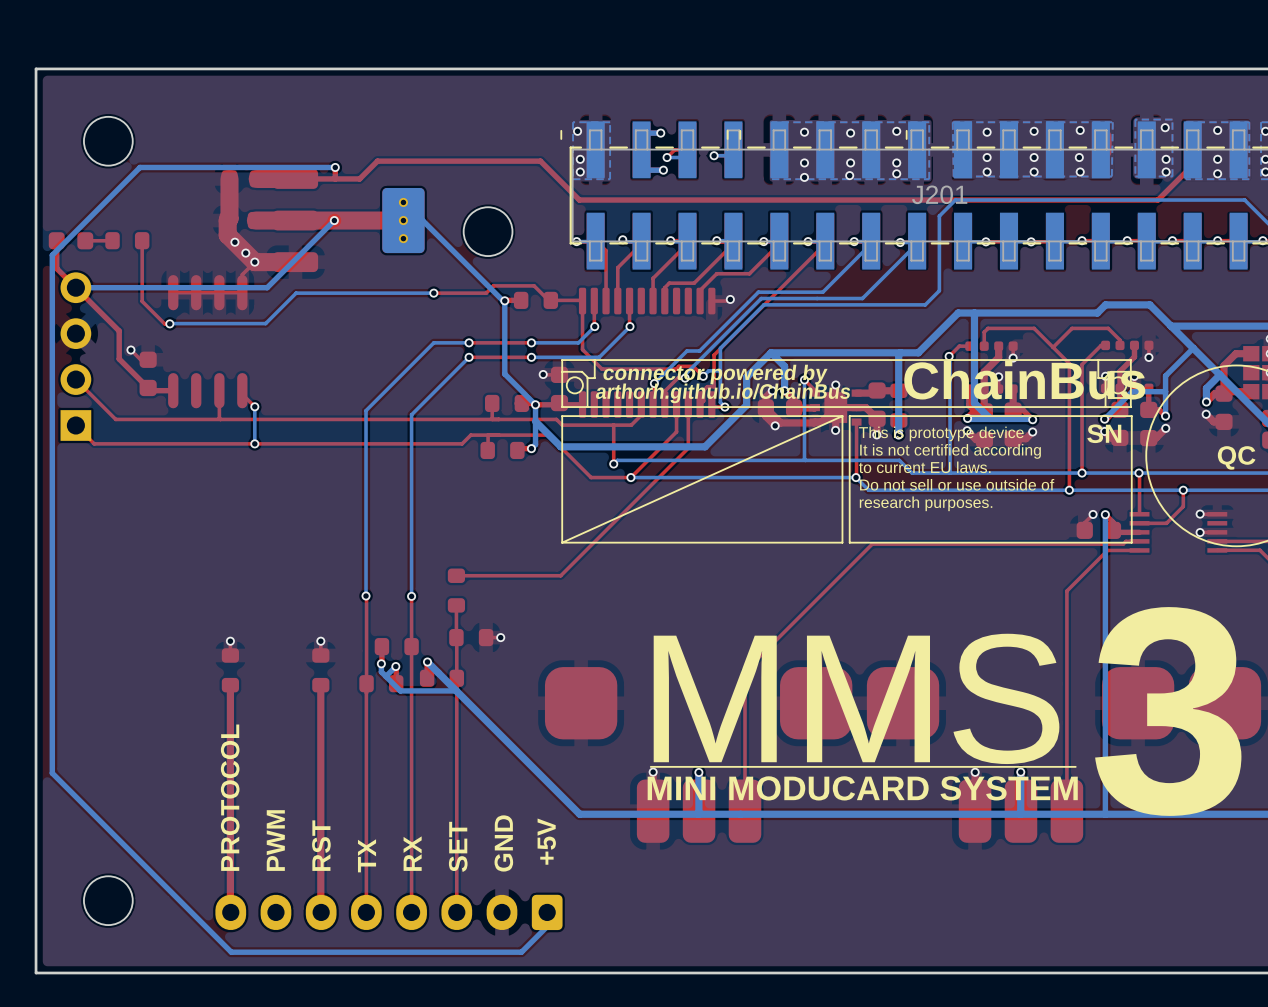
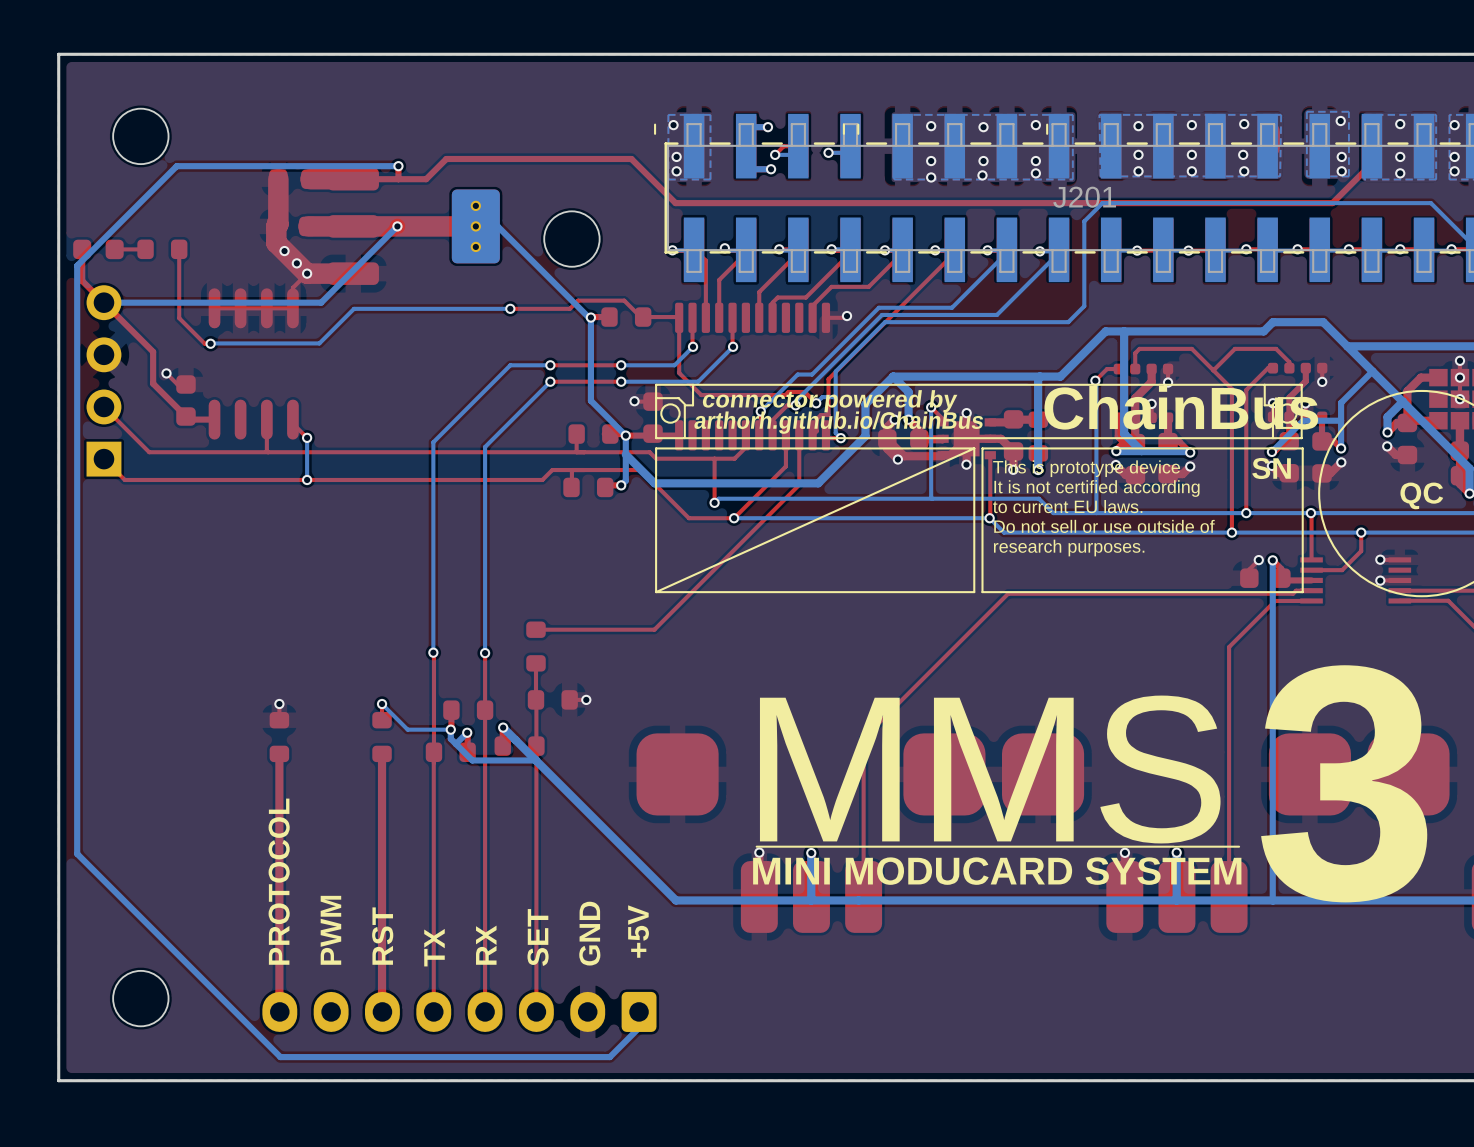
bottom track: none -> (382, 704) (407, 729) (450, 729)

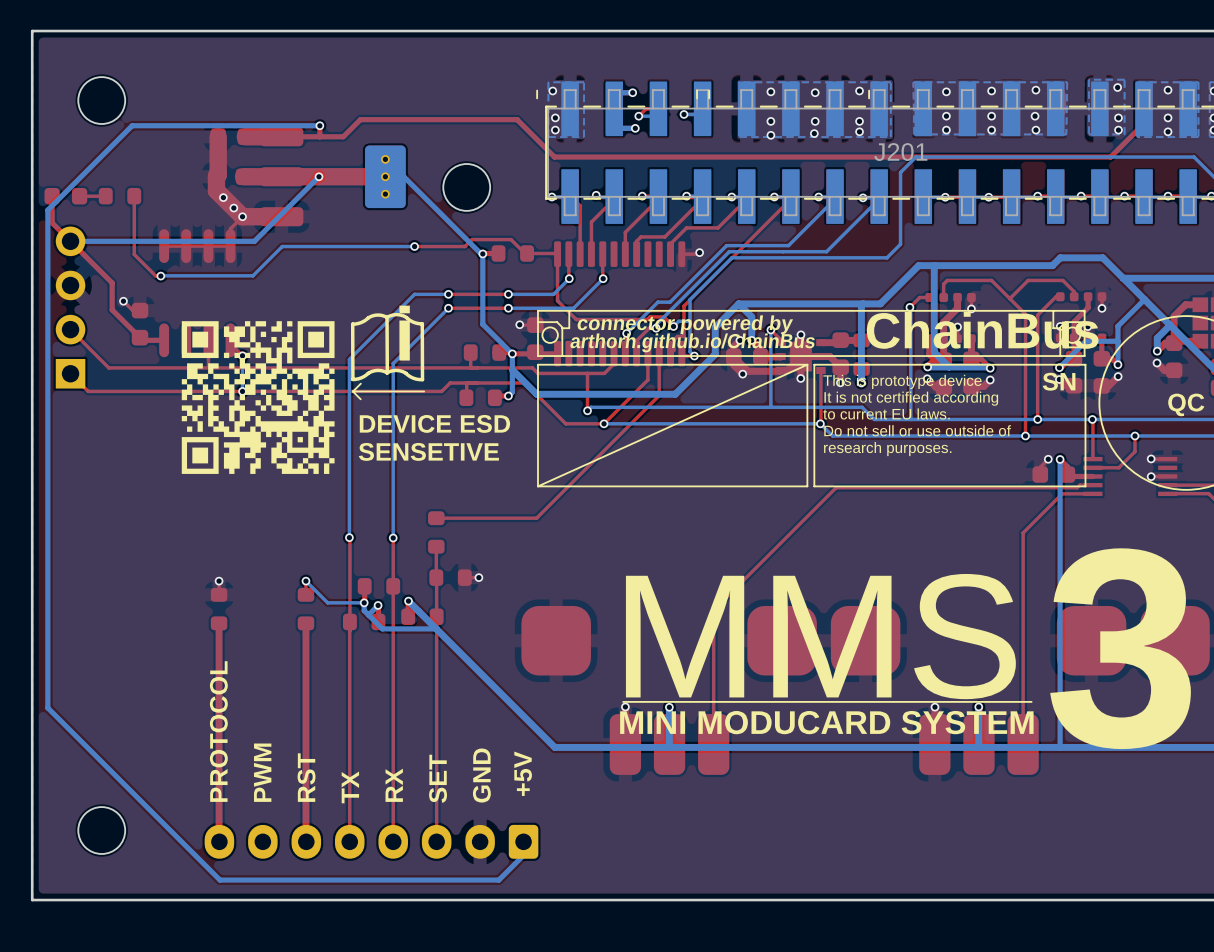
line: none -> (387, 317) (387, 372) (375, 370) (361, 377) (352, 379) (352, 324) (361, 322) (373, 315) (387, 317)
line: none -> (387, 317) (397, 314) (406, 317)
line: none -> (406, 317) (413, 322) (422, 323) (422, 379) (413, 378) (406, 373)
drawing: none -> [181, 321, 335, 474]
text: none -> i (404, 333)
line: none -> (387, 372) (396, 370) (406, 373)
line: none -> (360, 383) (353, 391)
line: none -> (424, 391) (352, 391) (360, 399)
text: none -> DEVICE ESD (434, 423)
text: none -> SENSETIVE (428, 451)

